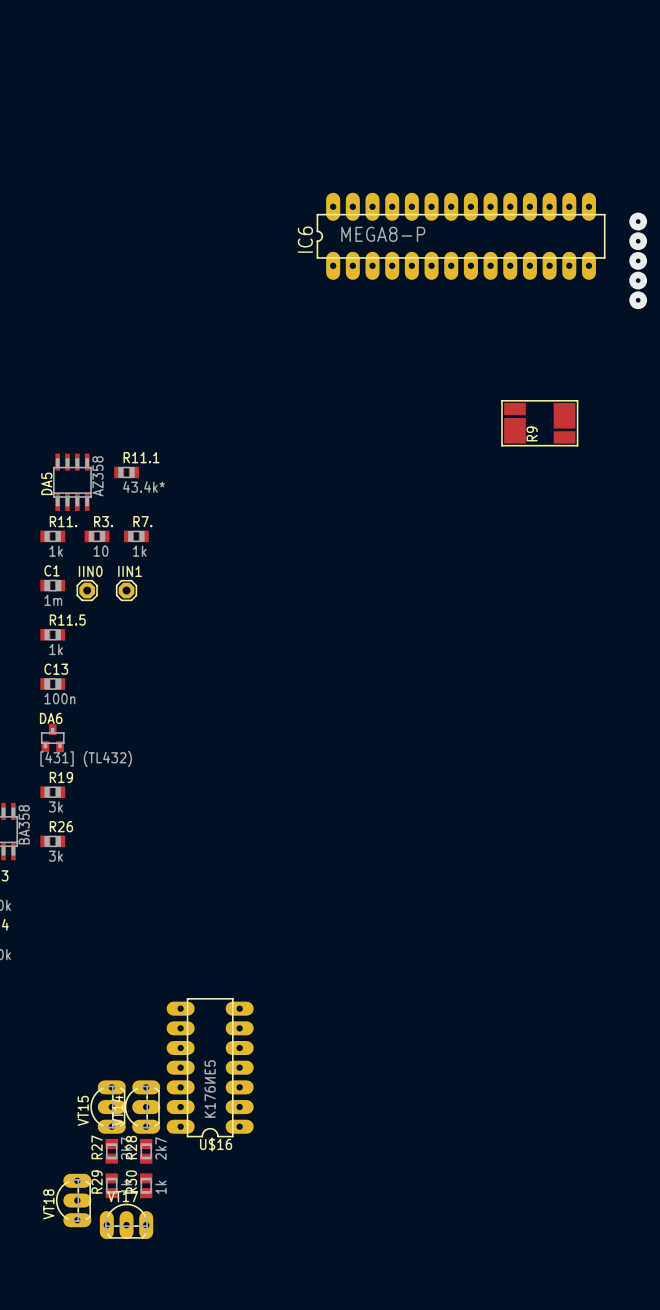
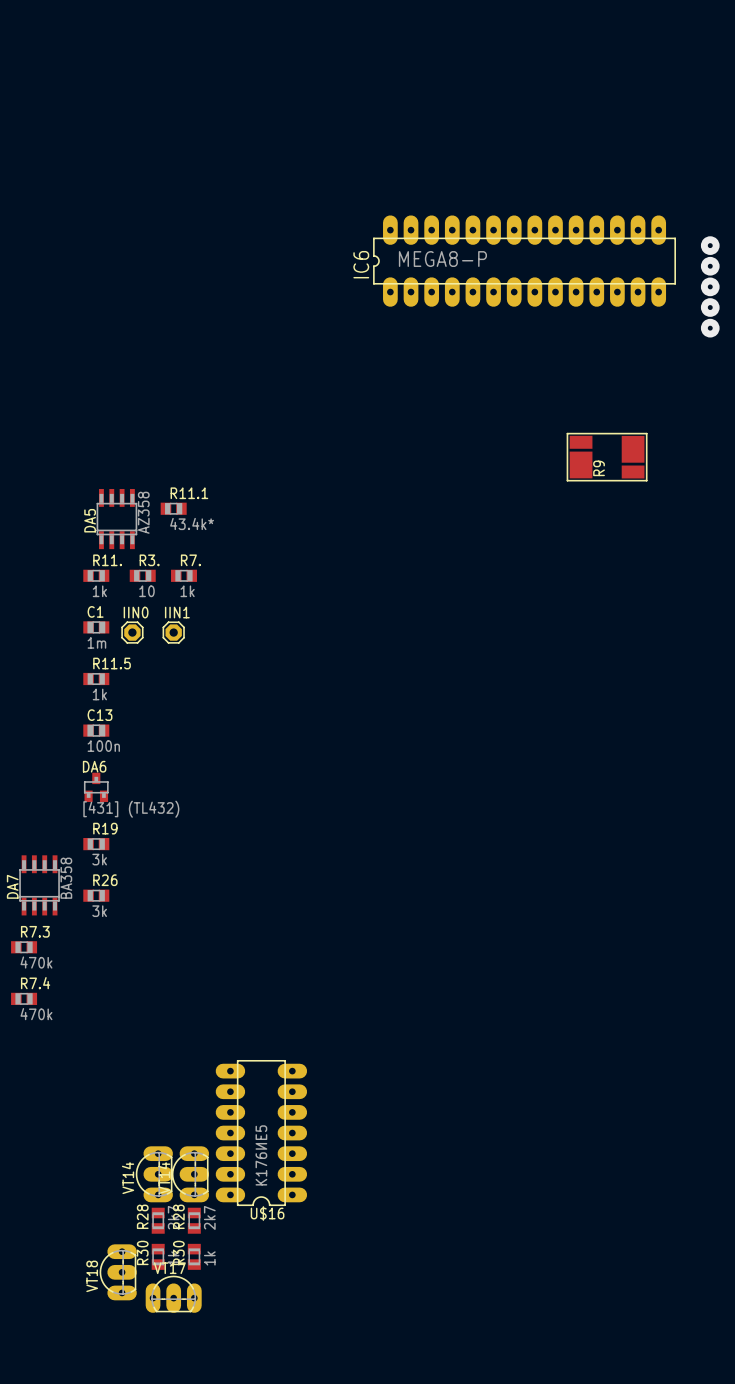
VT15 name: VT15 (83, 1110) -> VT14 (128, 1178)
R27 name: R27 (97, 1147) -> R28 (142, 1216)
R29 name: R29 (97, 1182) -> R30 (142, 1252)

